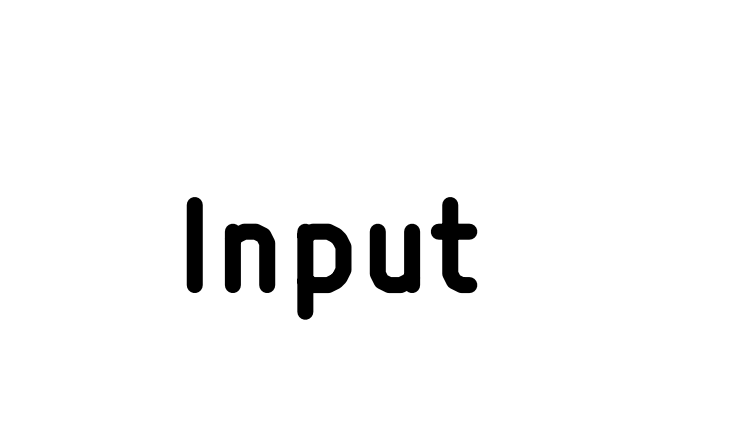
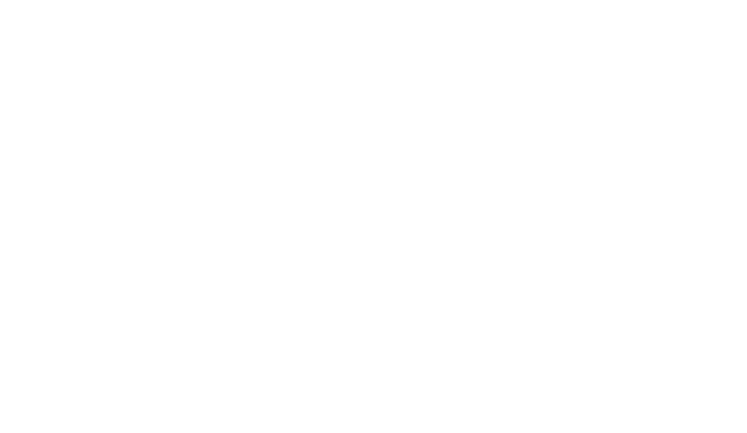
text: Input (332, 258) -> none

